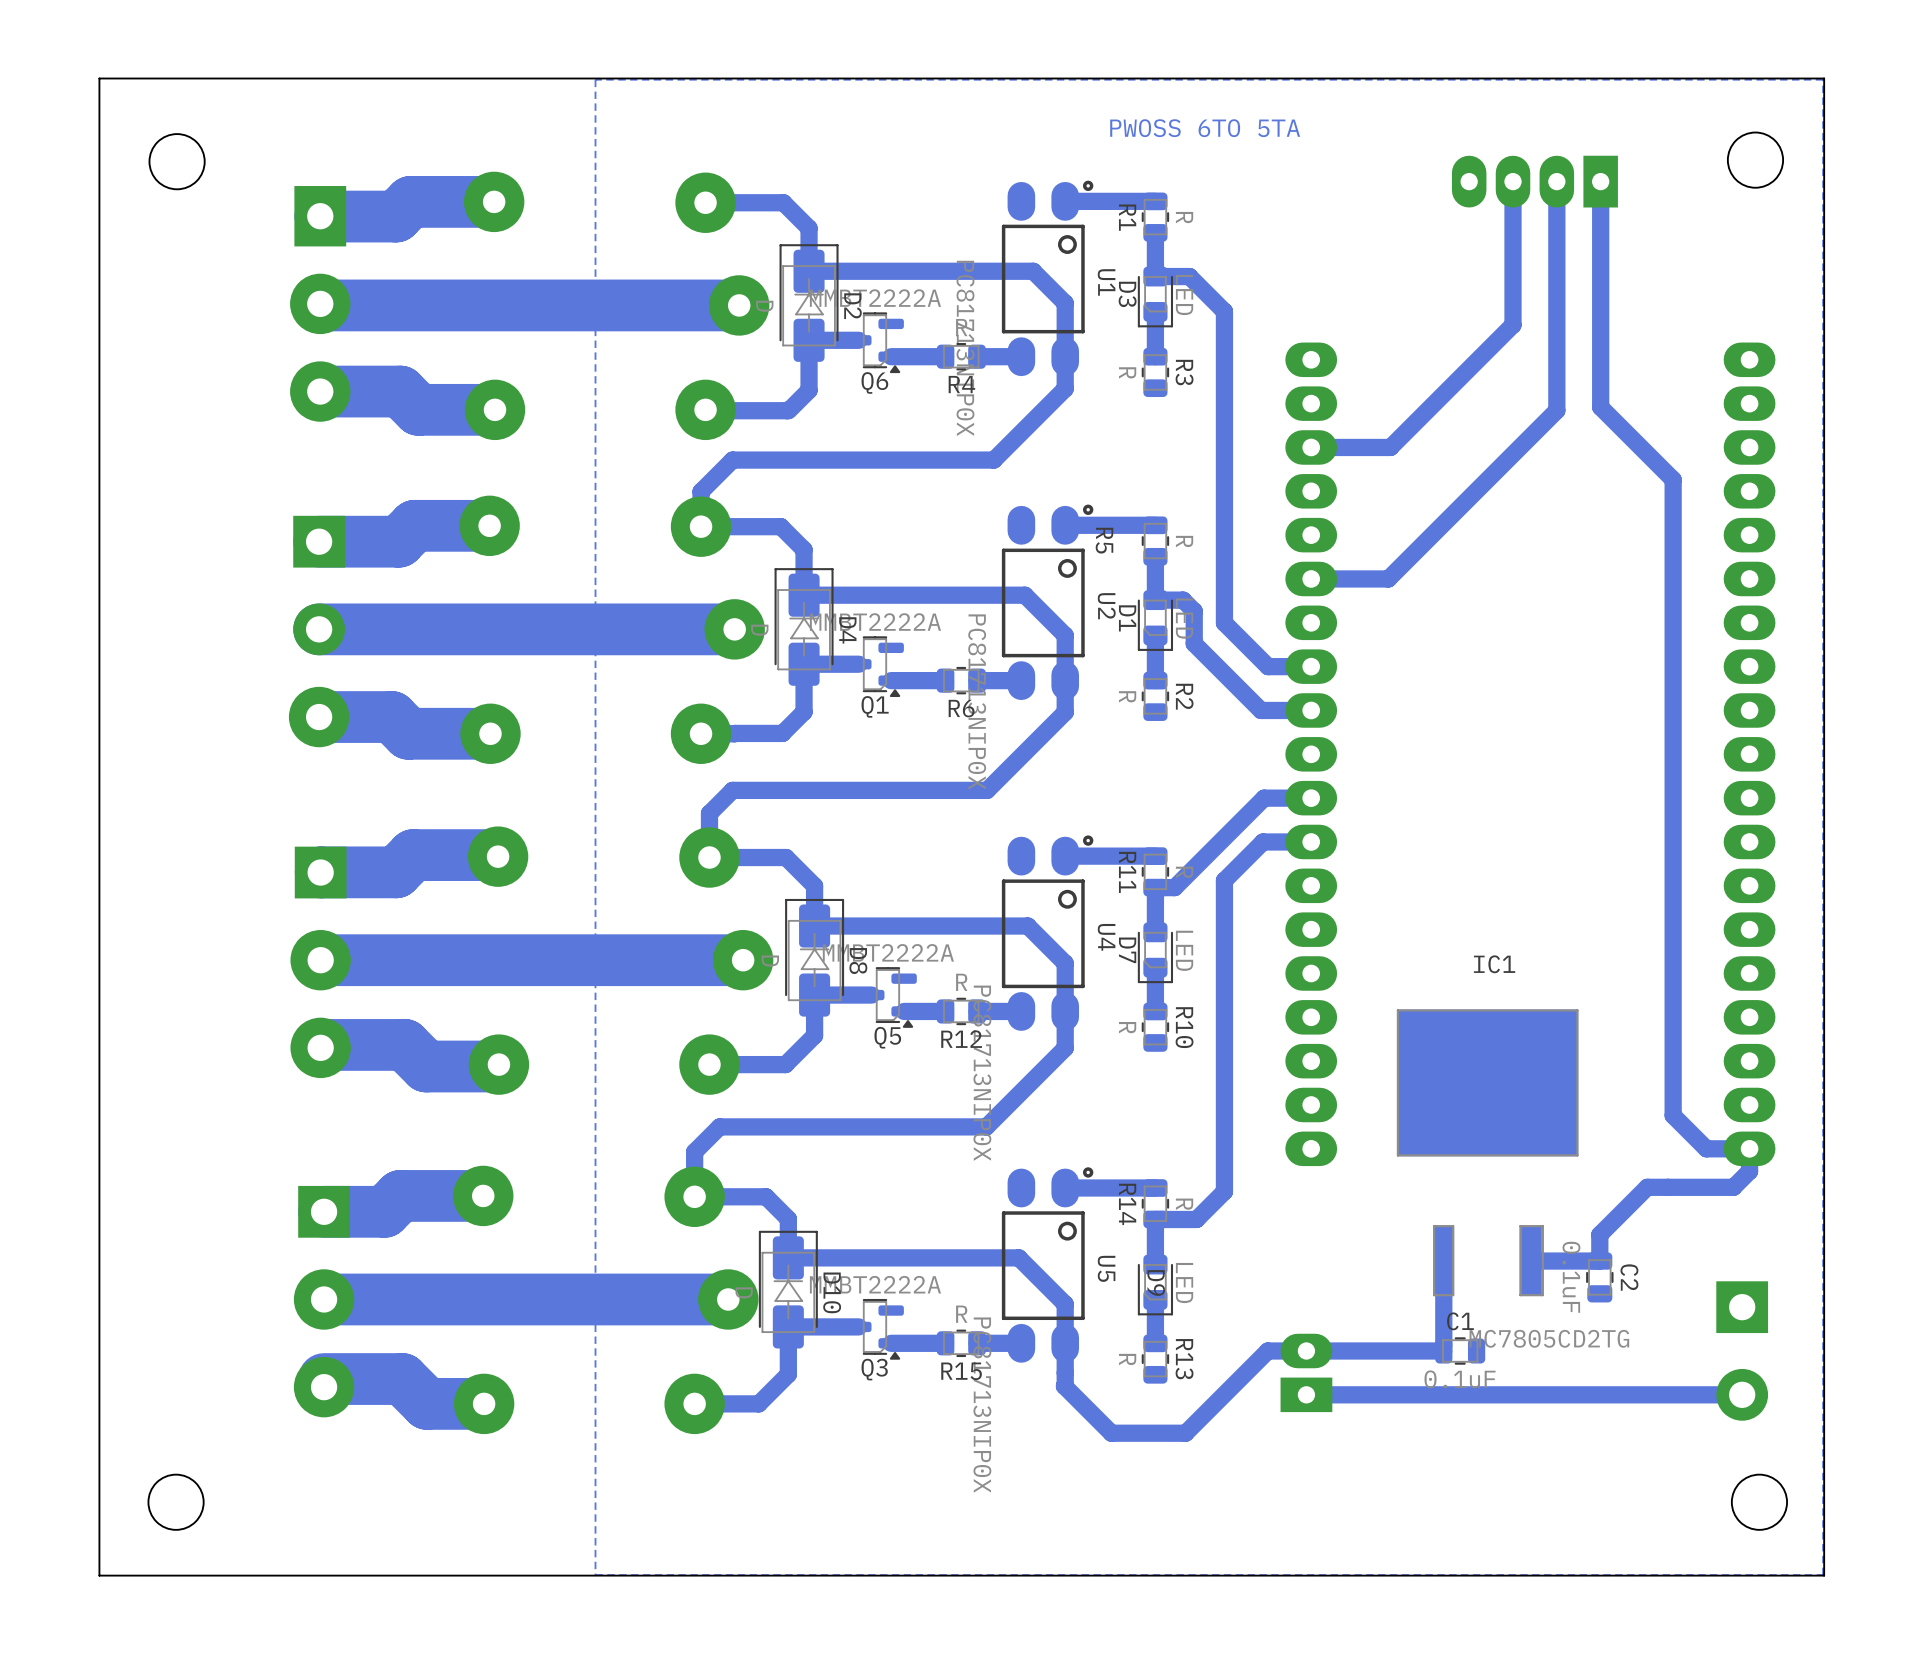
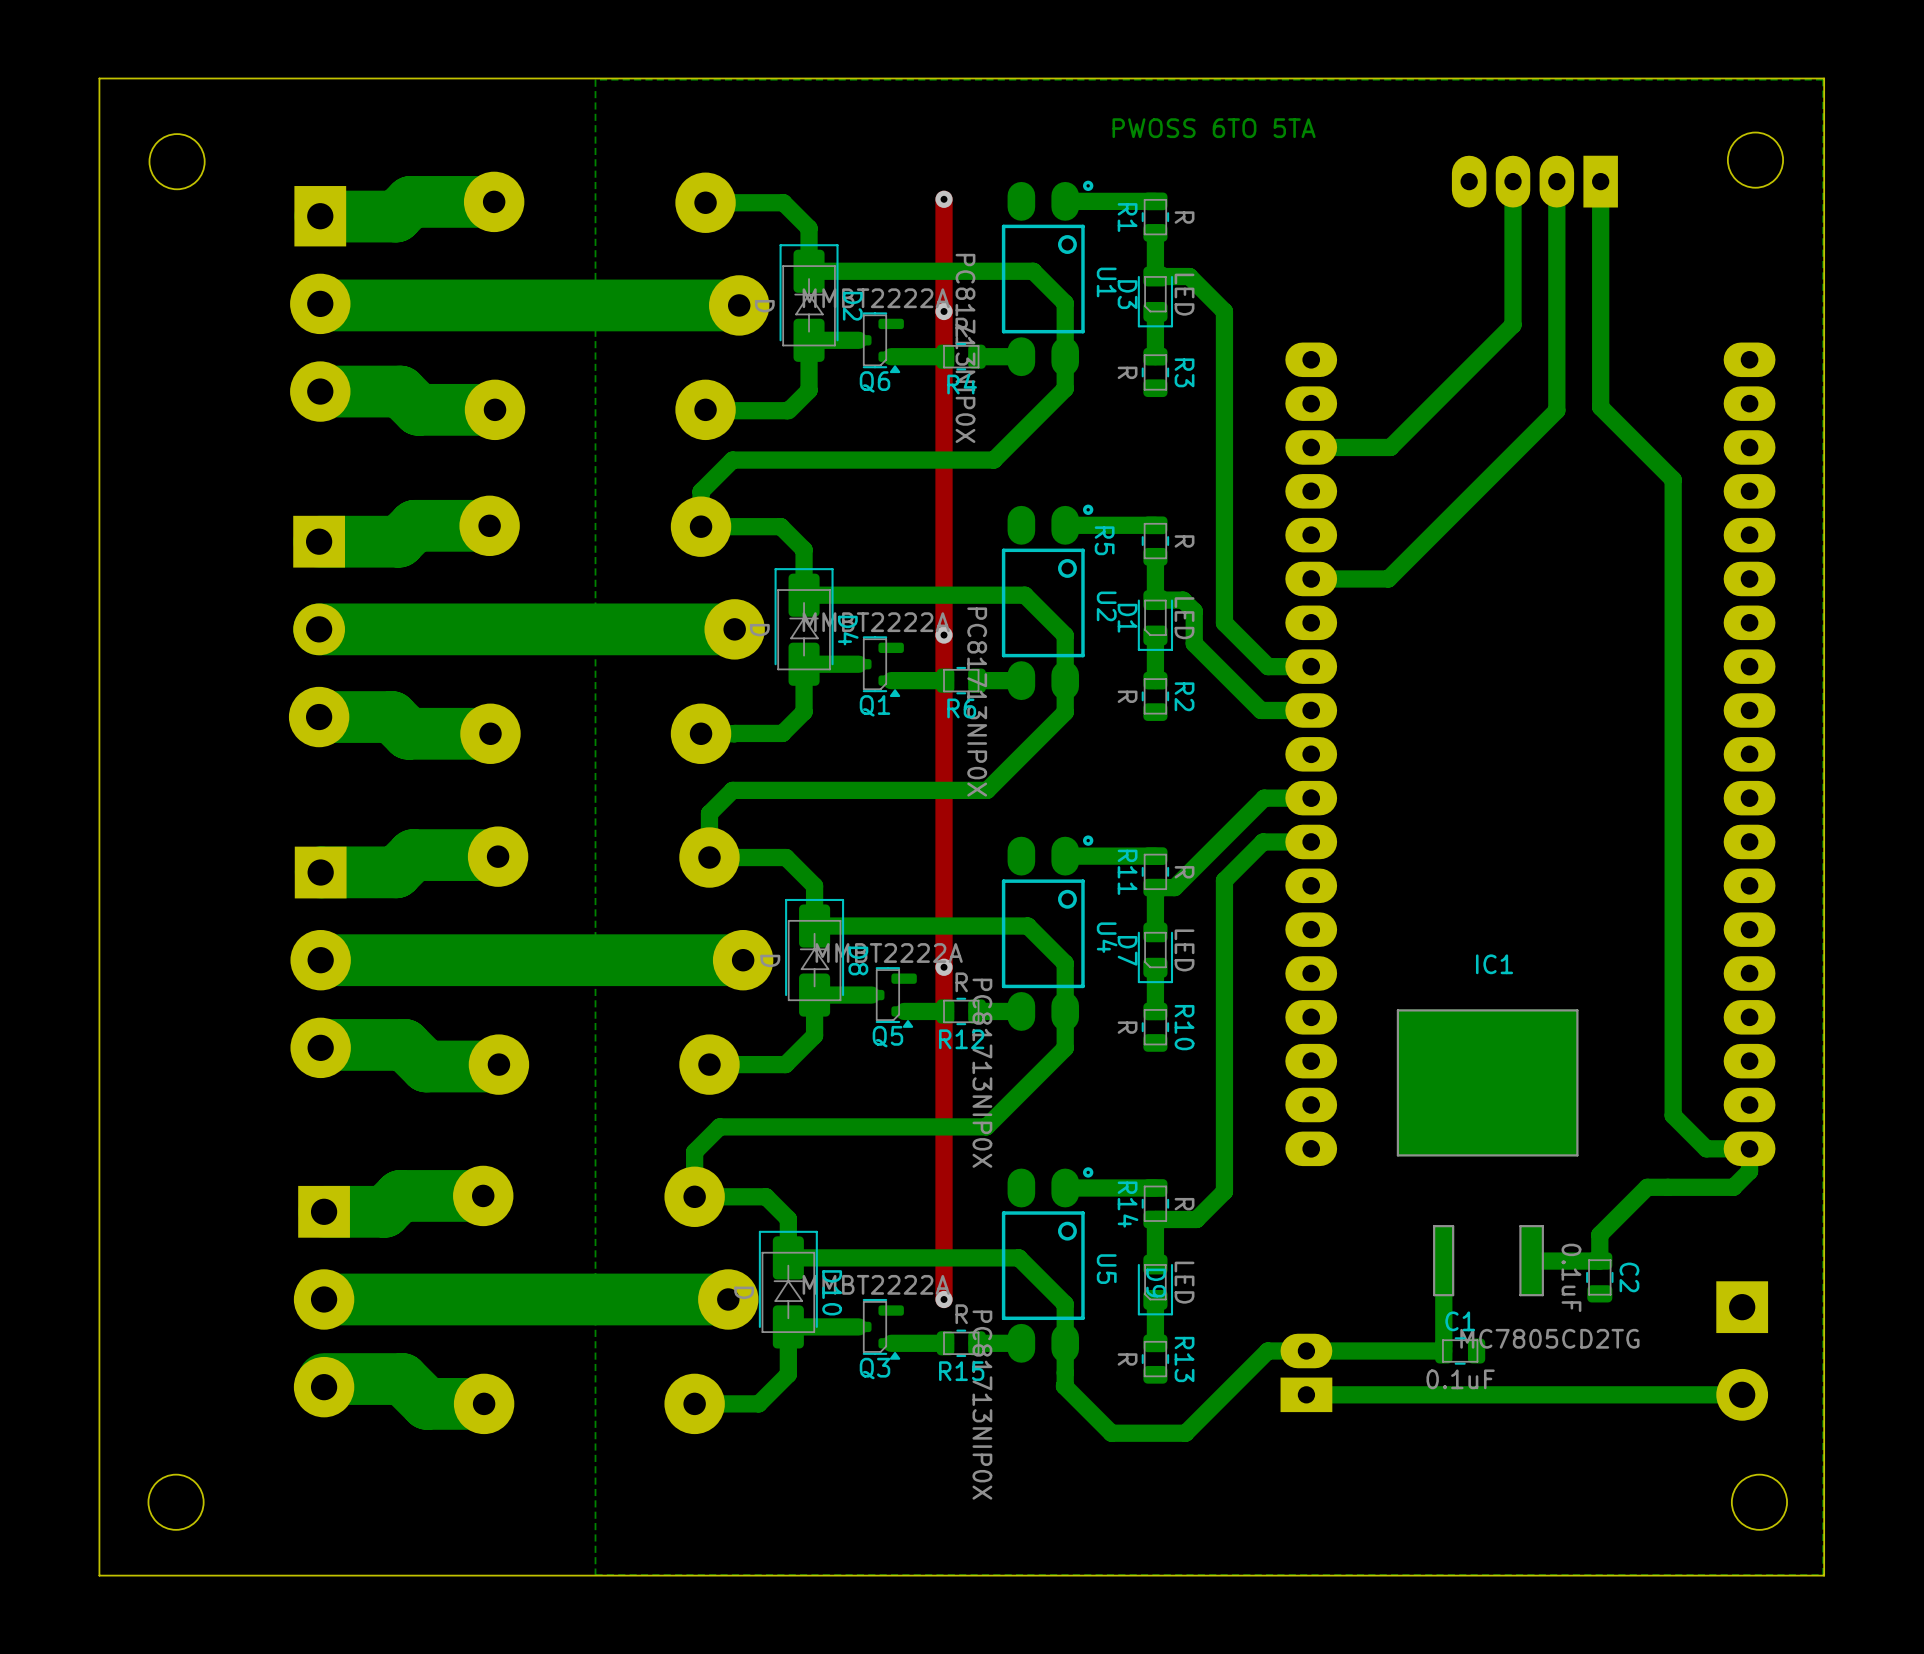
top track: none -> (944, 199) (944, 1299)
via: none -> (944, 199)
via: none -> (944, 311)
via: none -> (944, 635)
via: none -> (944, 967)
via: none -> (944, 1299)

